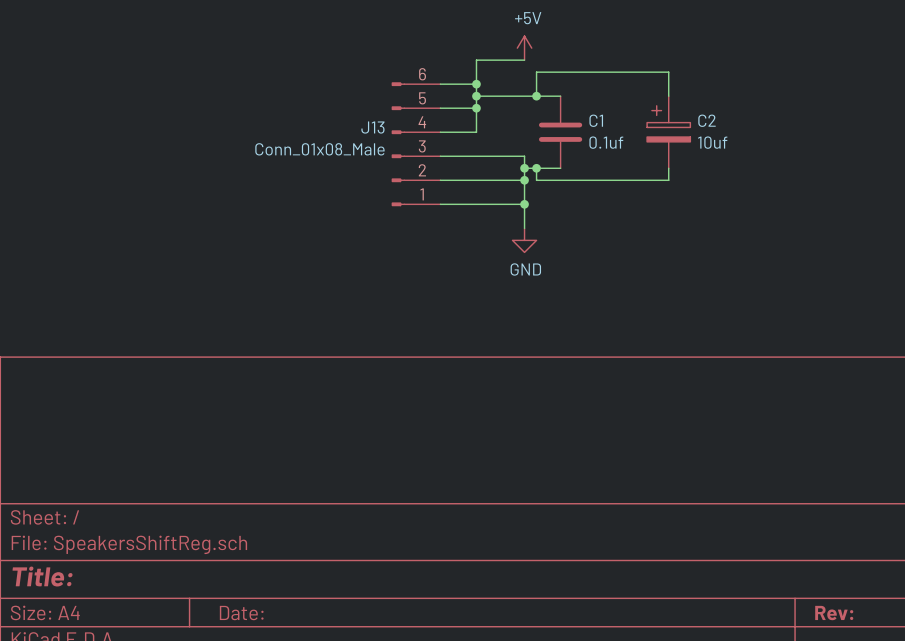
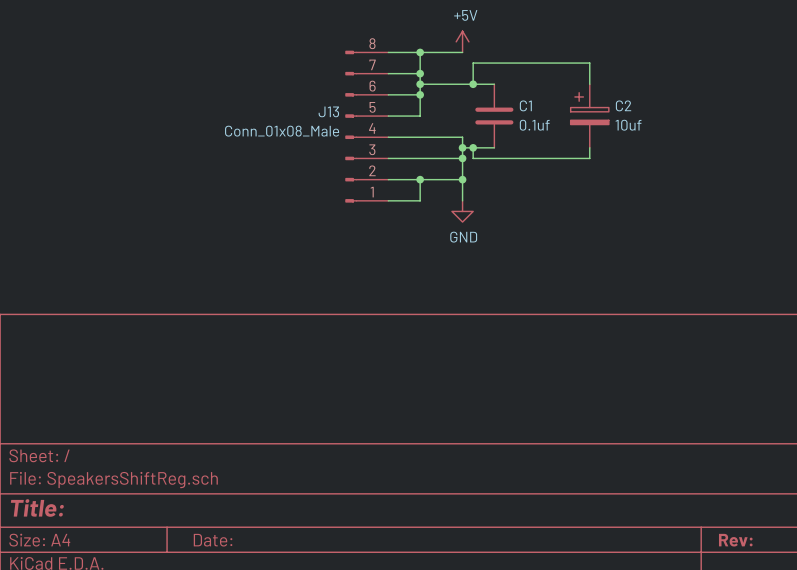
wire: none -> (388, 52) (420, 52)
junction: none -> (420, 52)
J13 symbol: [391, 82, 441, 207] -> [345, 50, 389, 203]
wire: none -> (420, 179) (420, 200) (388, 200)
junction: none -> (420, 179)

